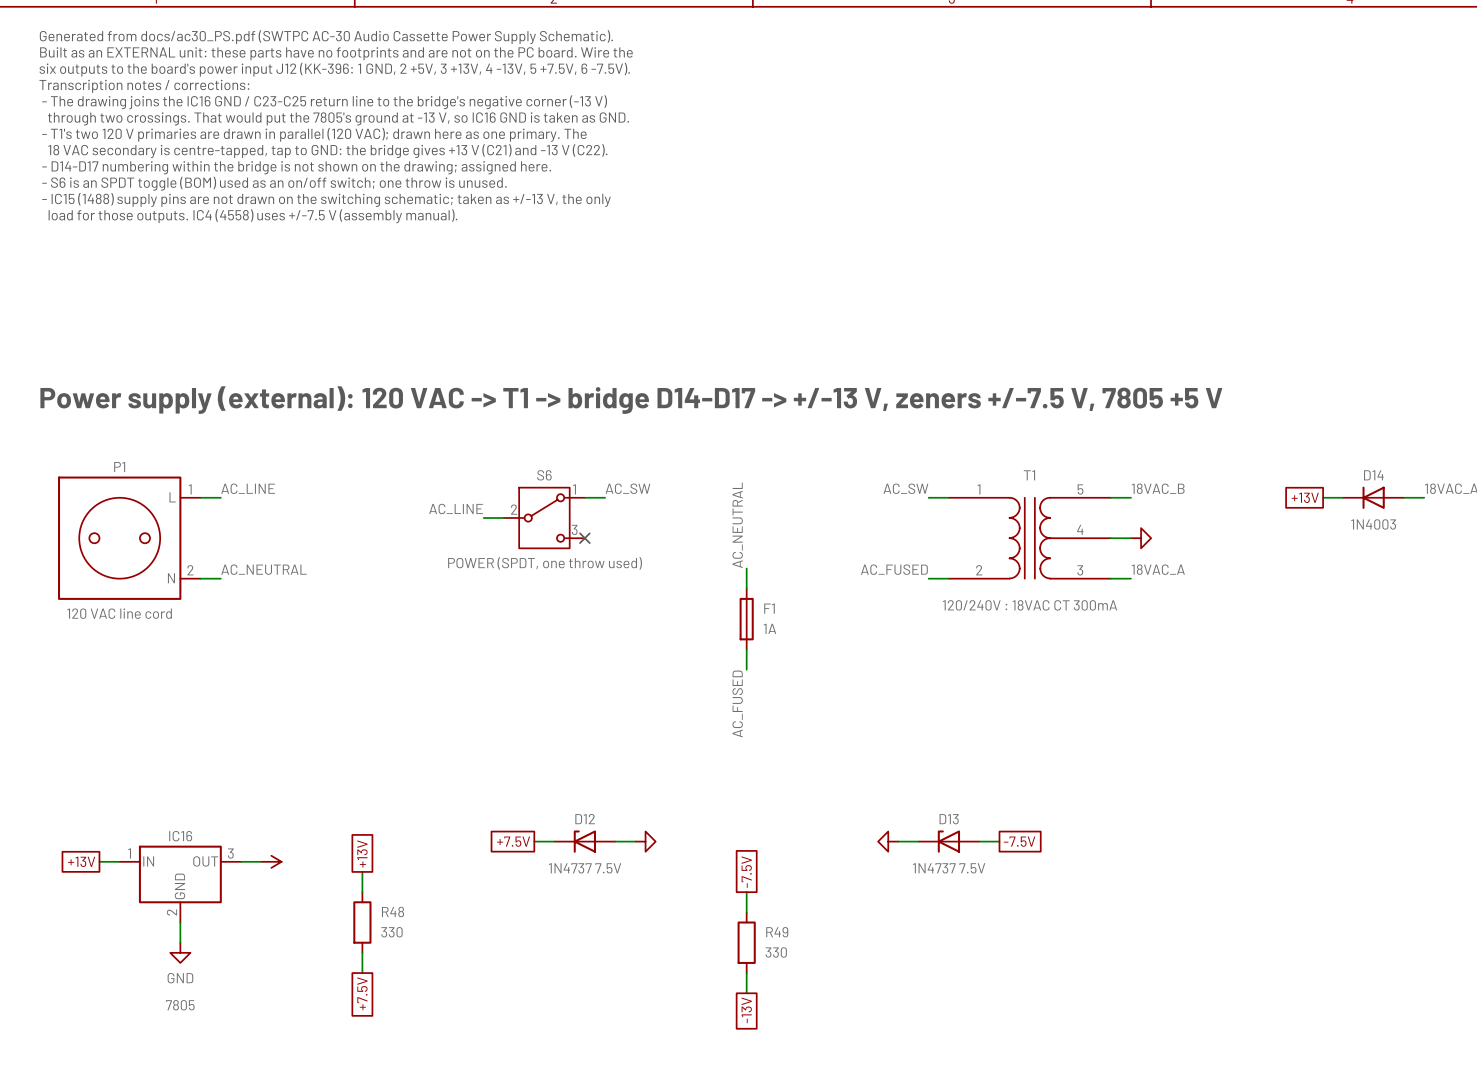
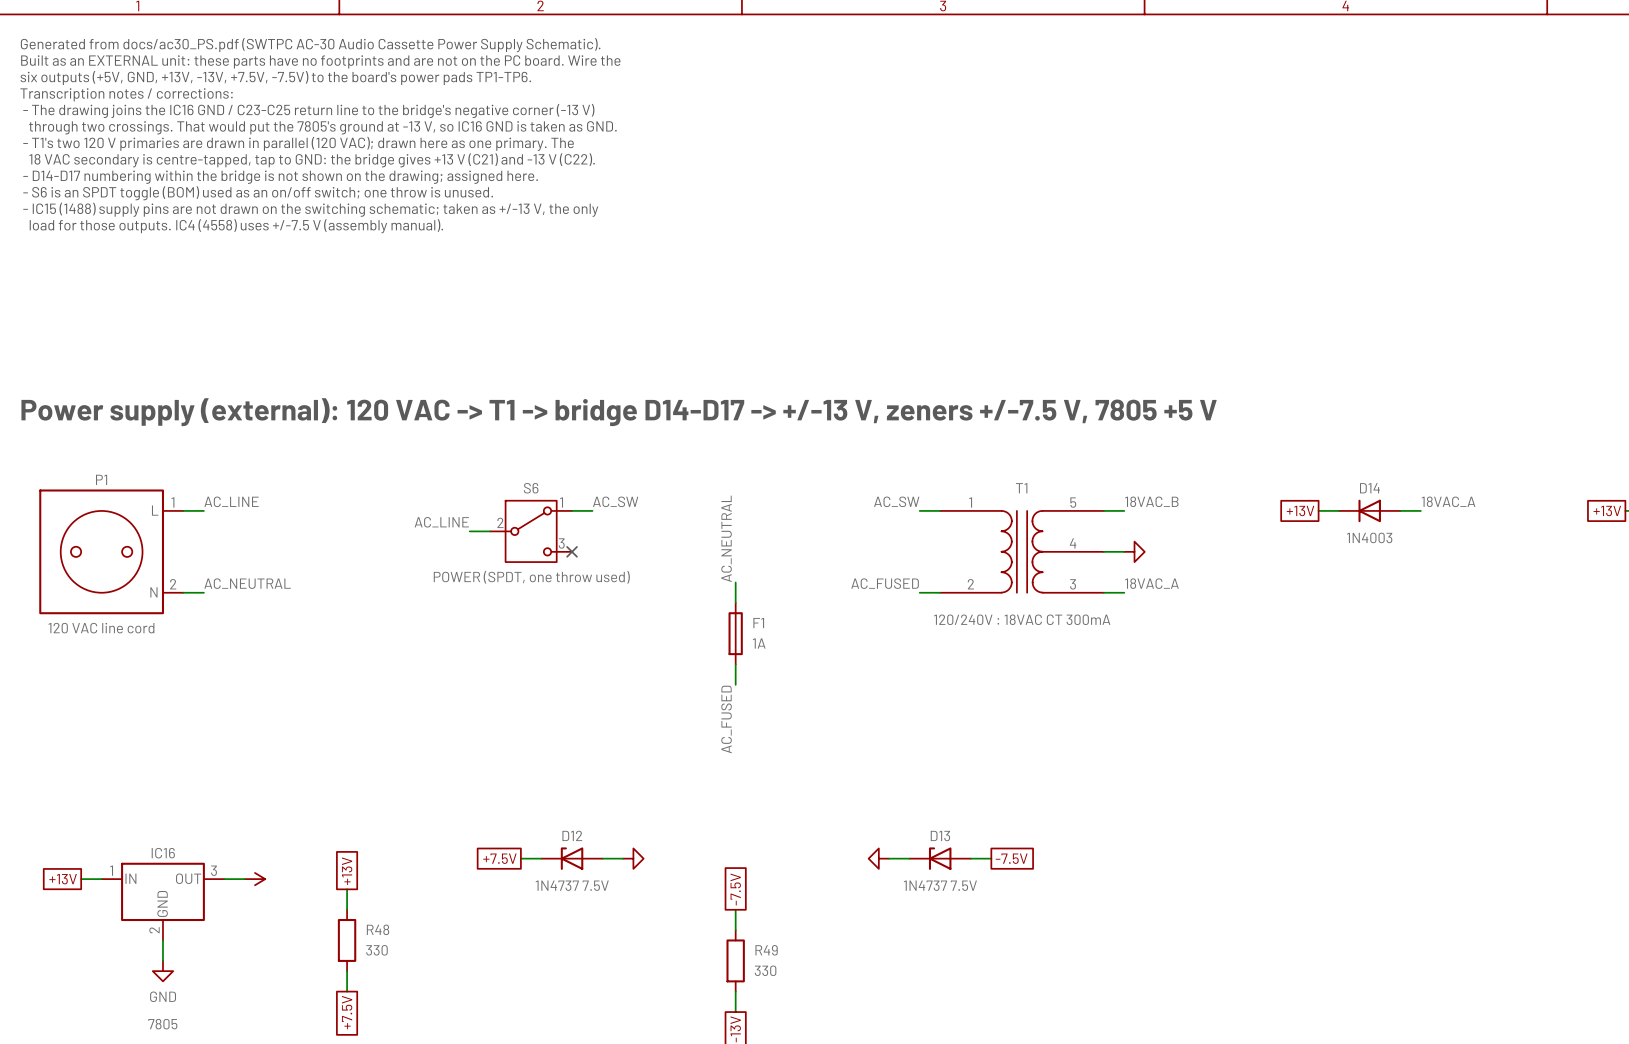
text: six outputs to the board's power input J12 (KK-396: 1 GND, 2 +5V, 3 +13V, 4 -13V, 5 +7.5V, 6 -7.5V). (334, 69) -> six outputs (+5V, GND, +13V, -13V, +7.5V, -7.5V) to the board's power pads TP1-TP6. (275, 77)

